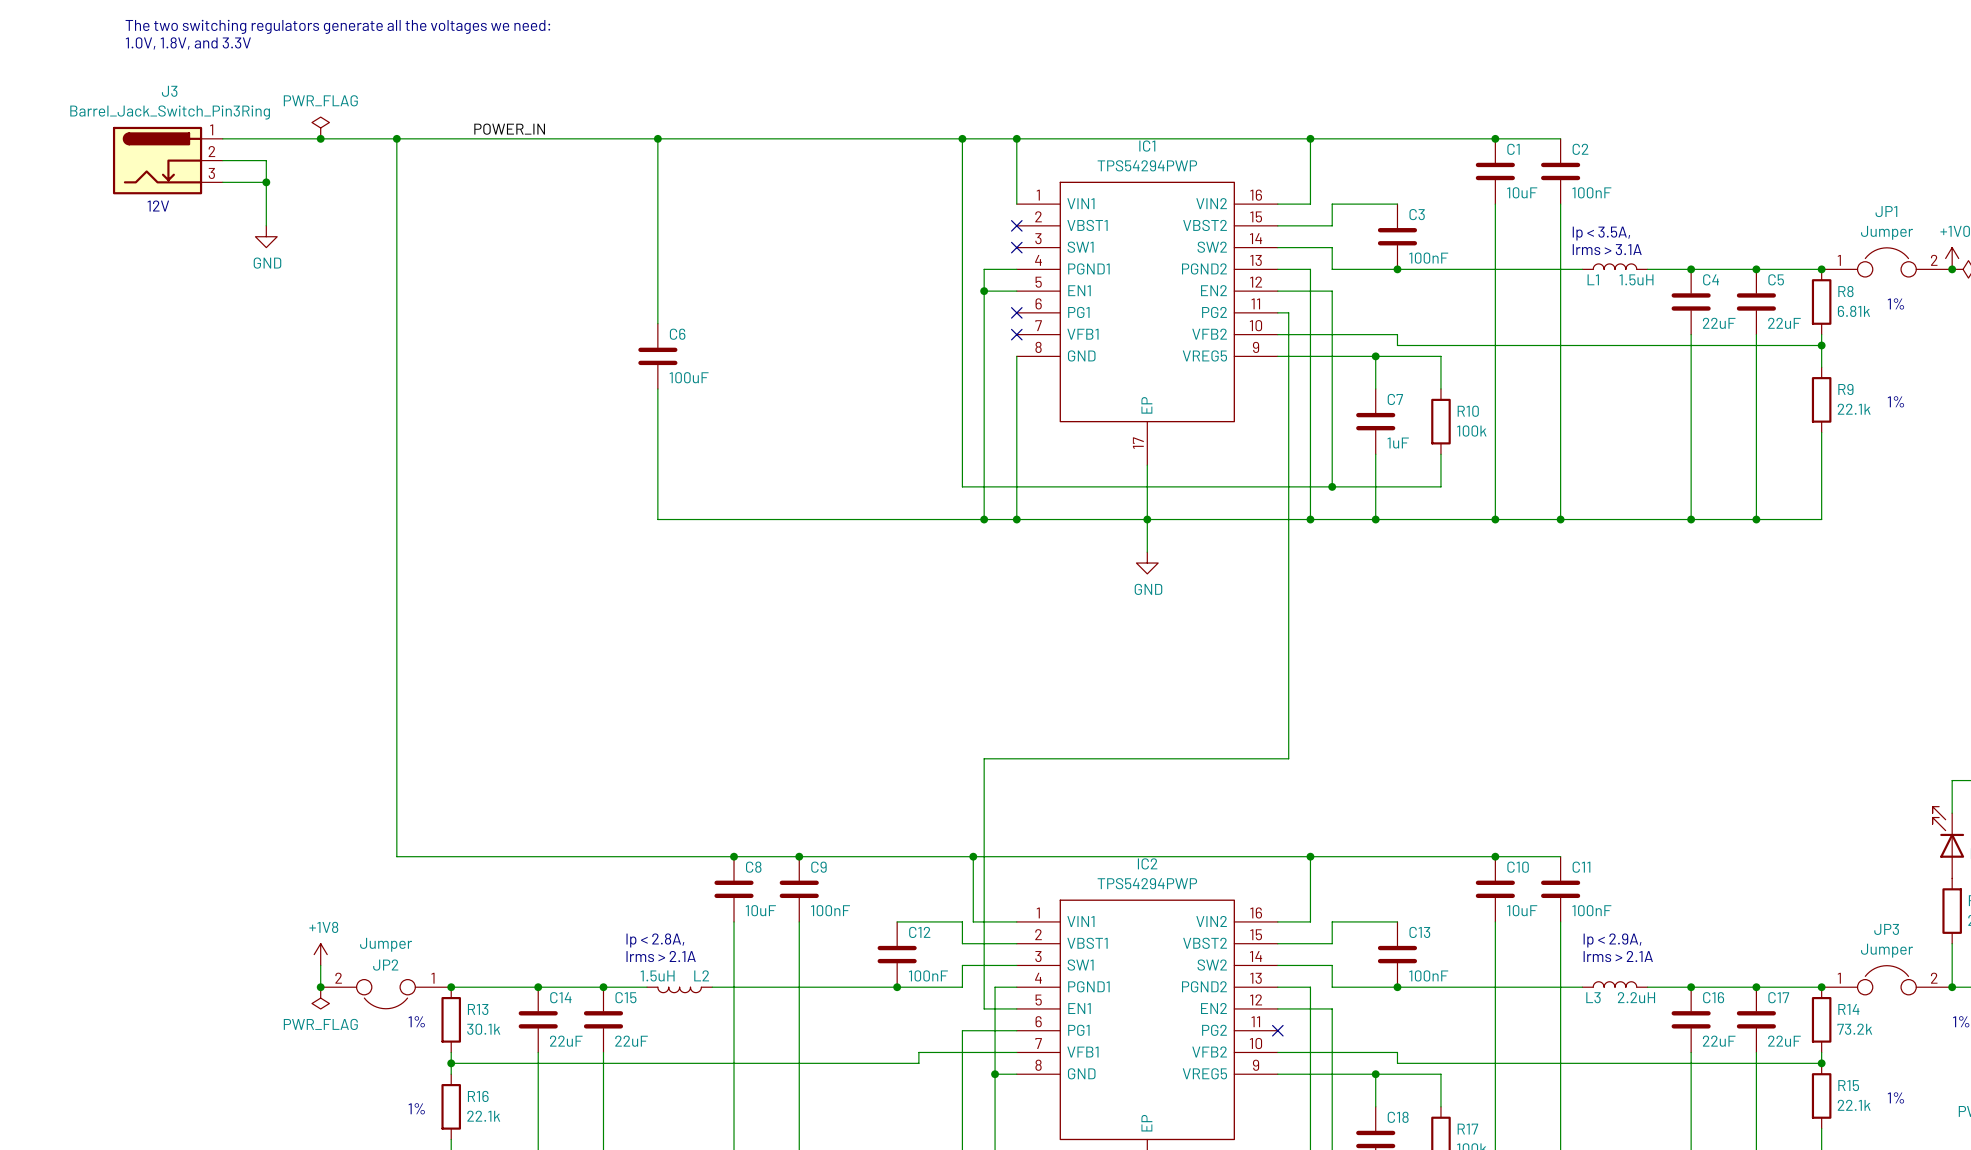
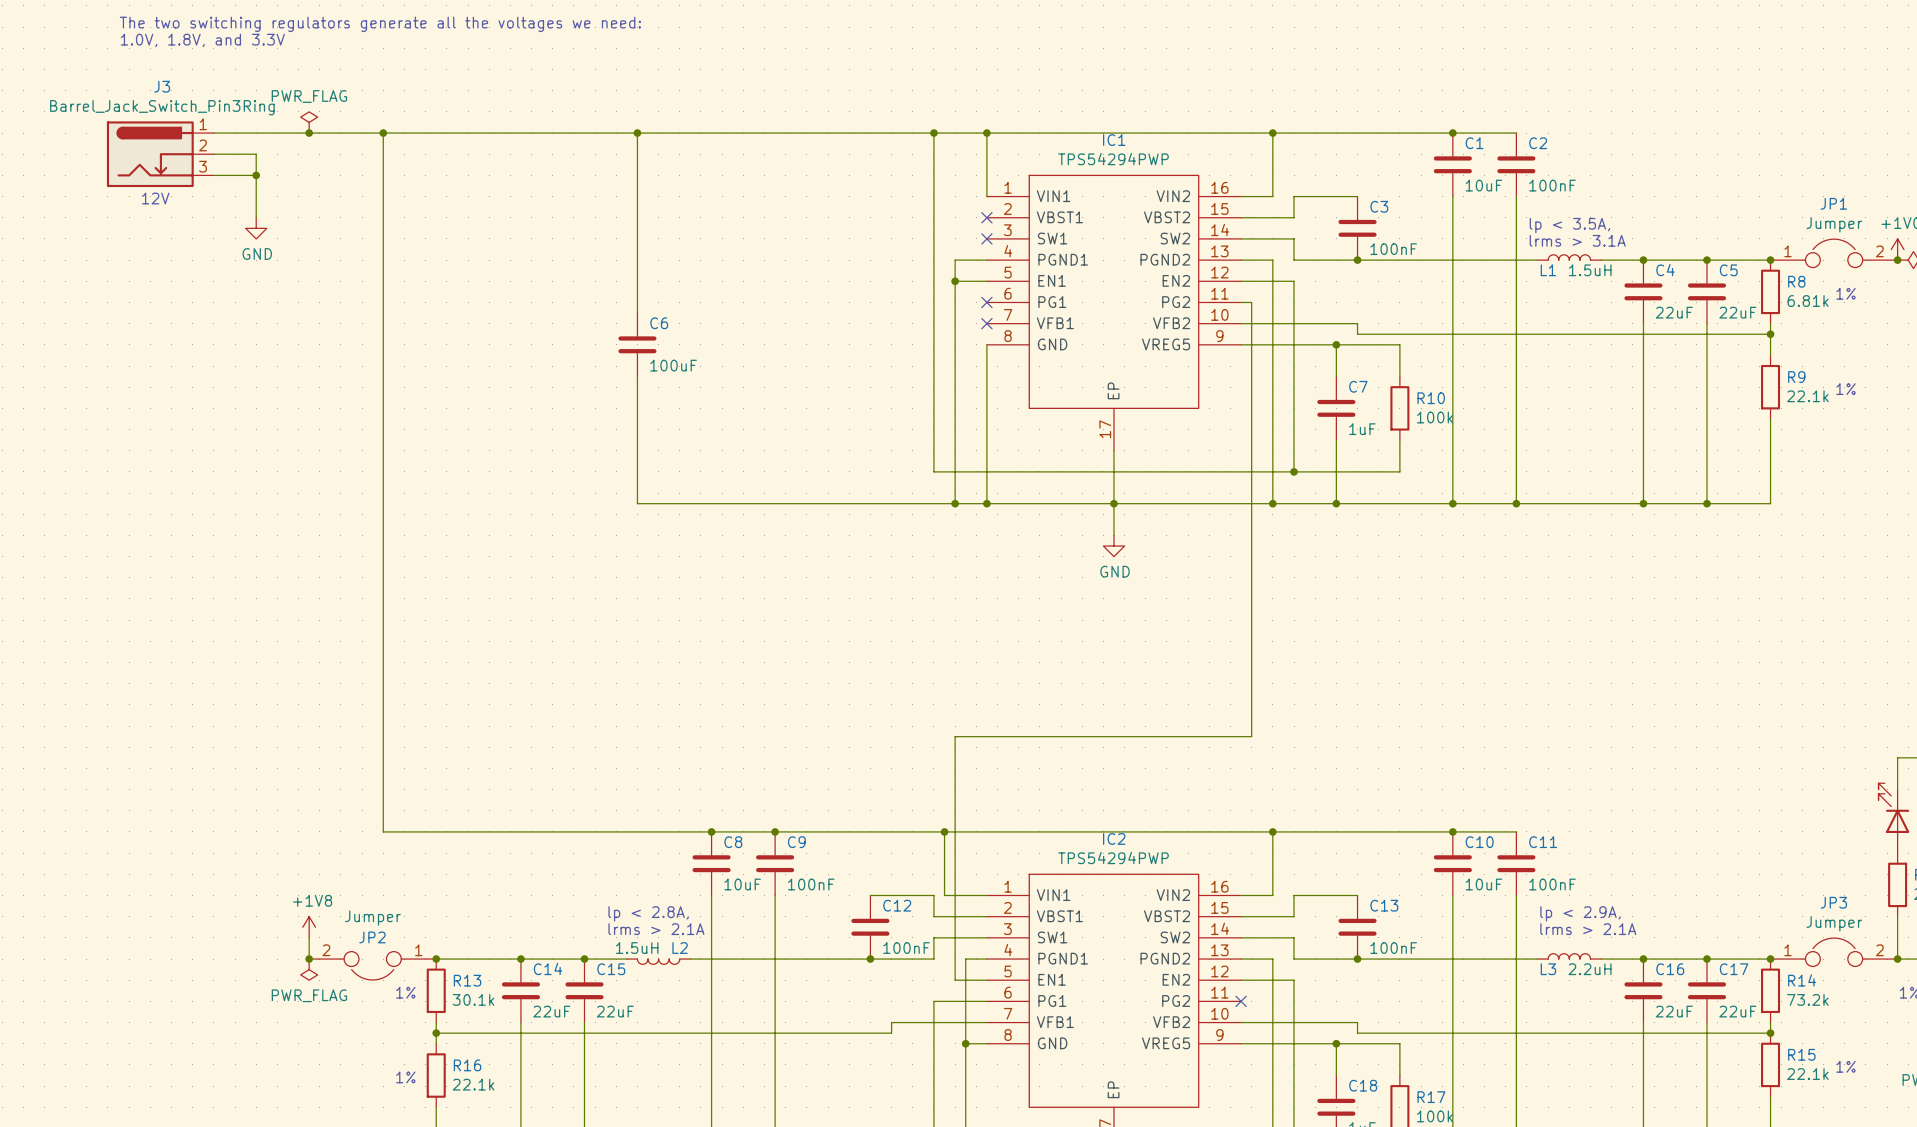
label: POWER_IN (509, 129) -> none

